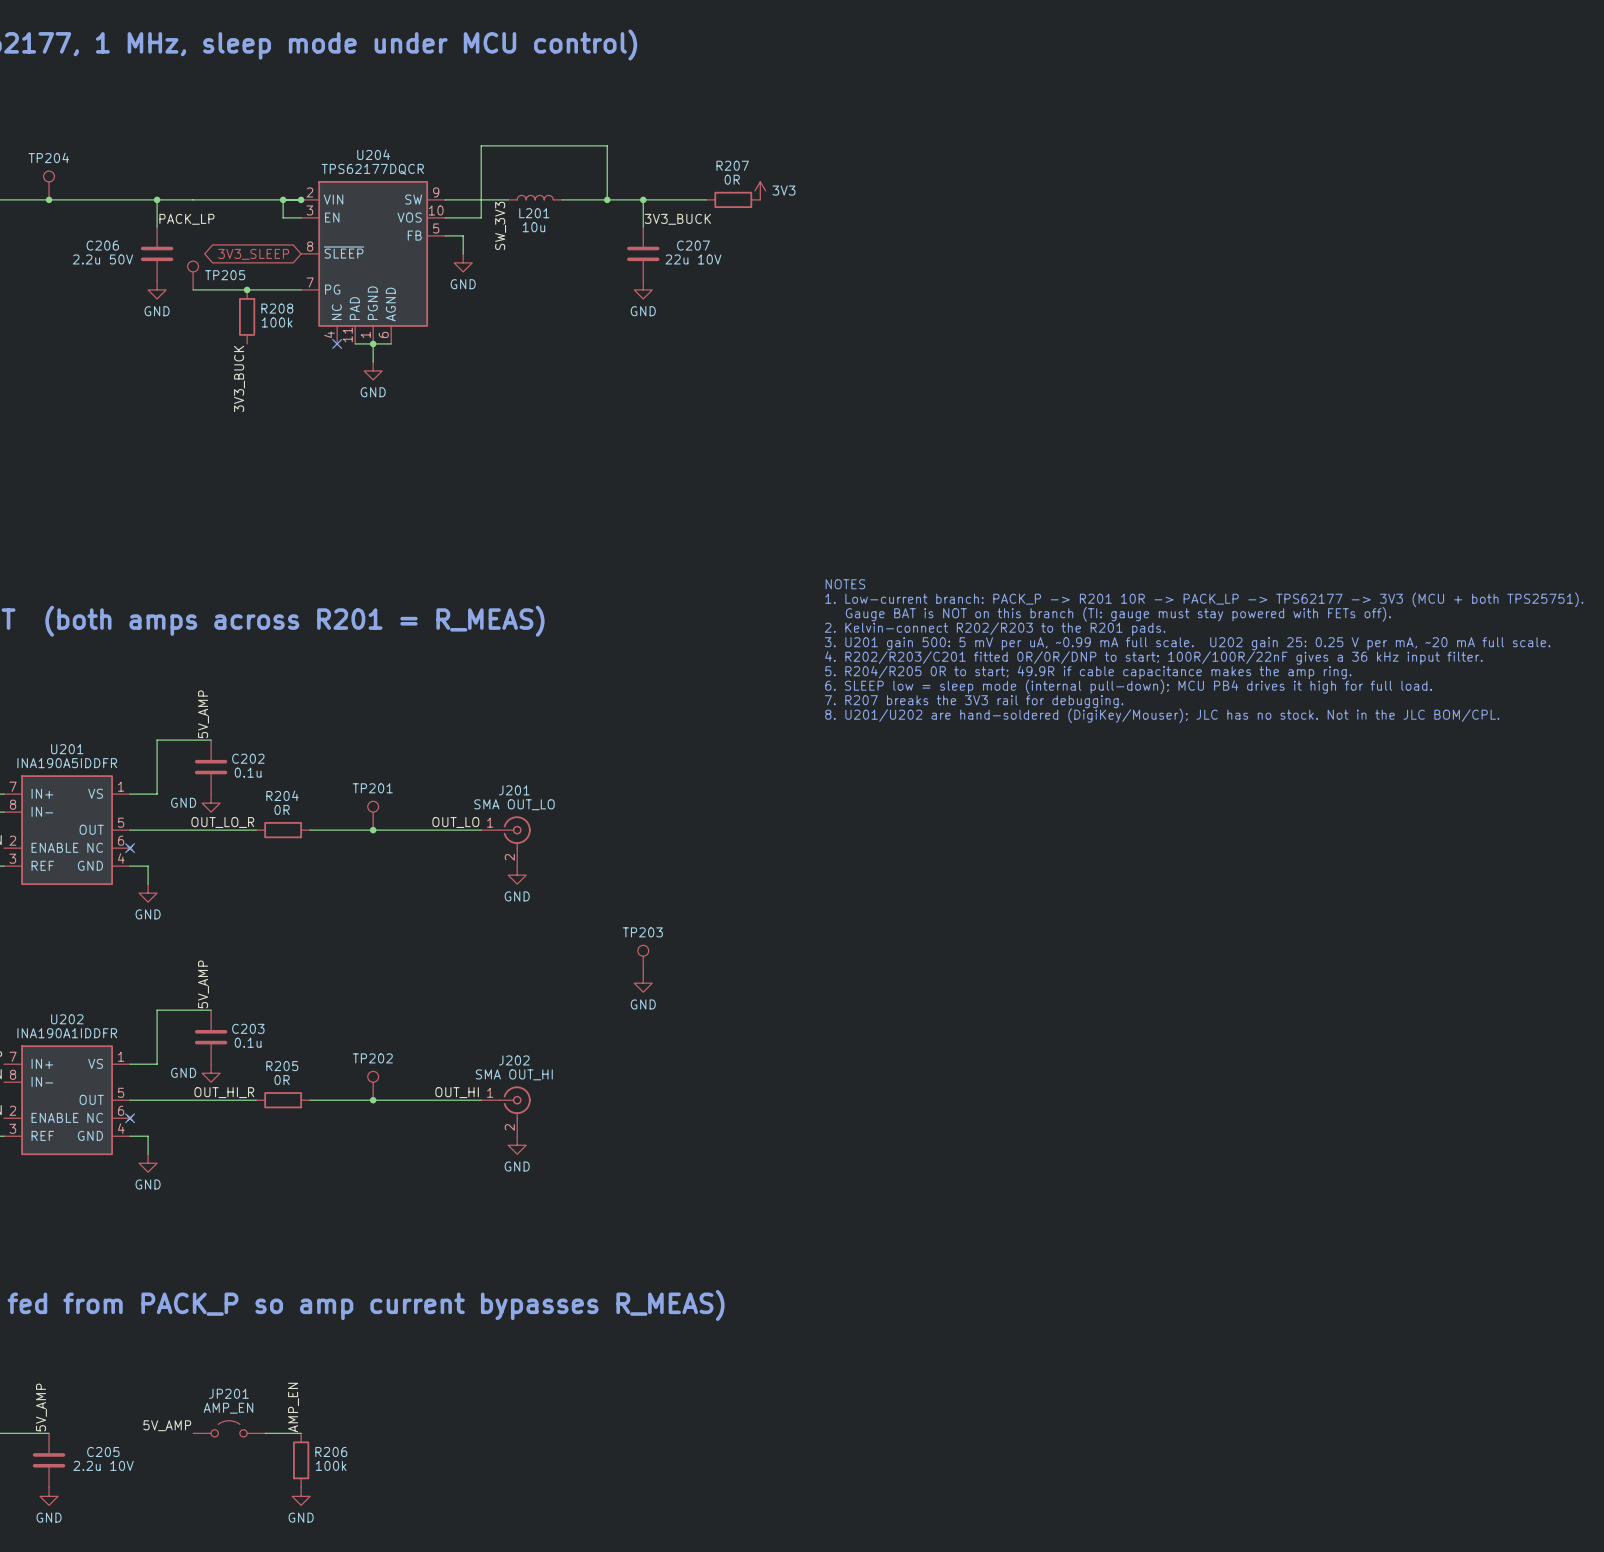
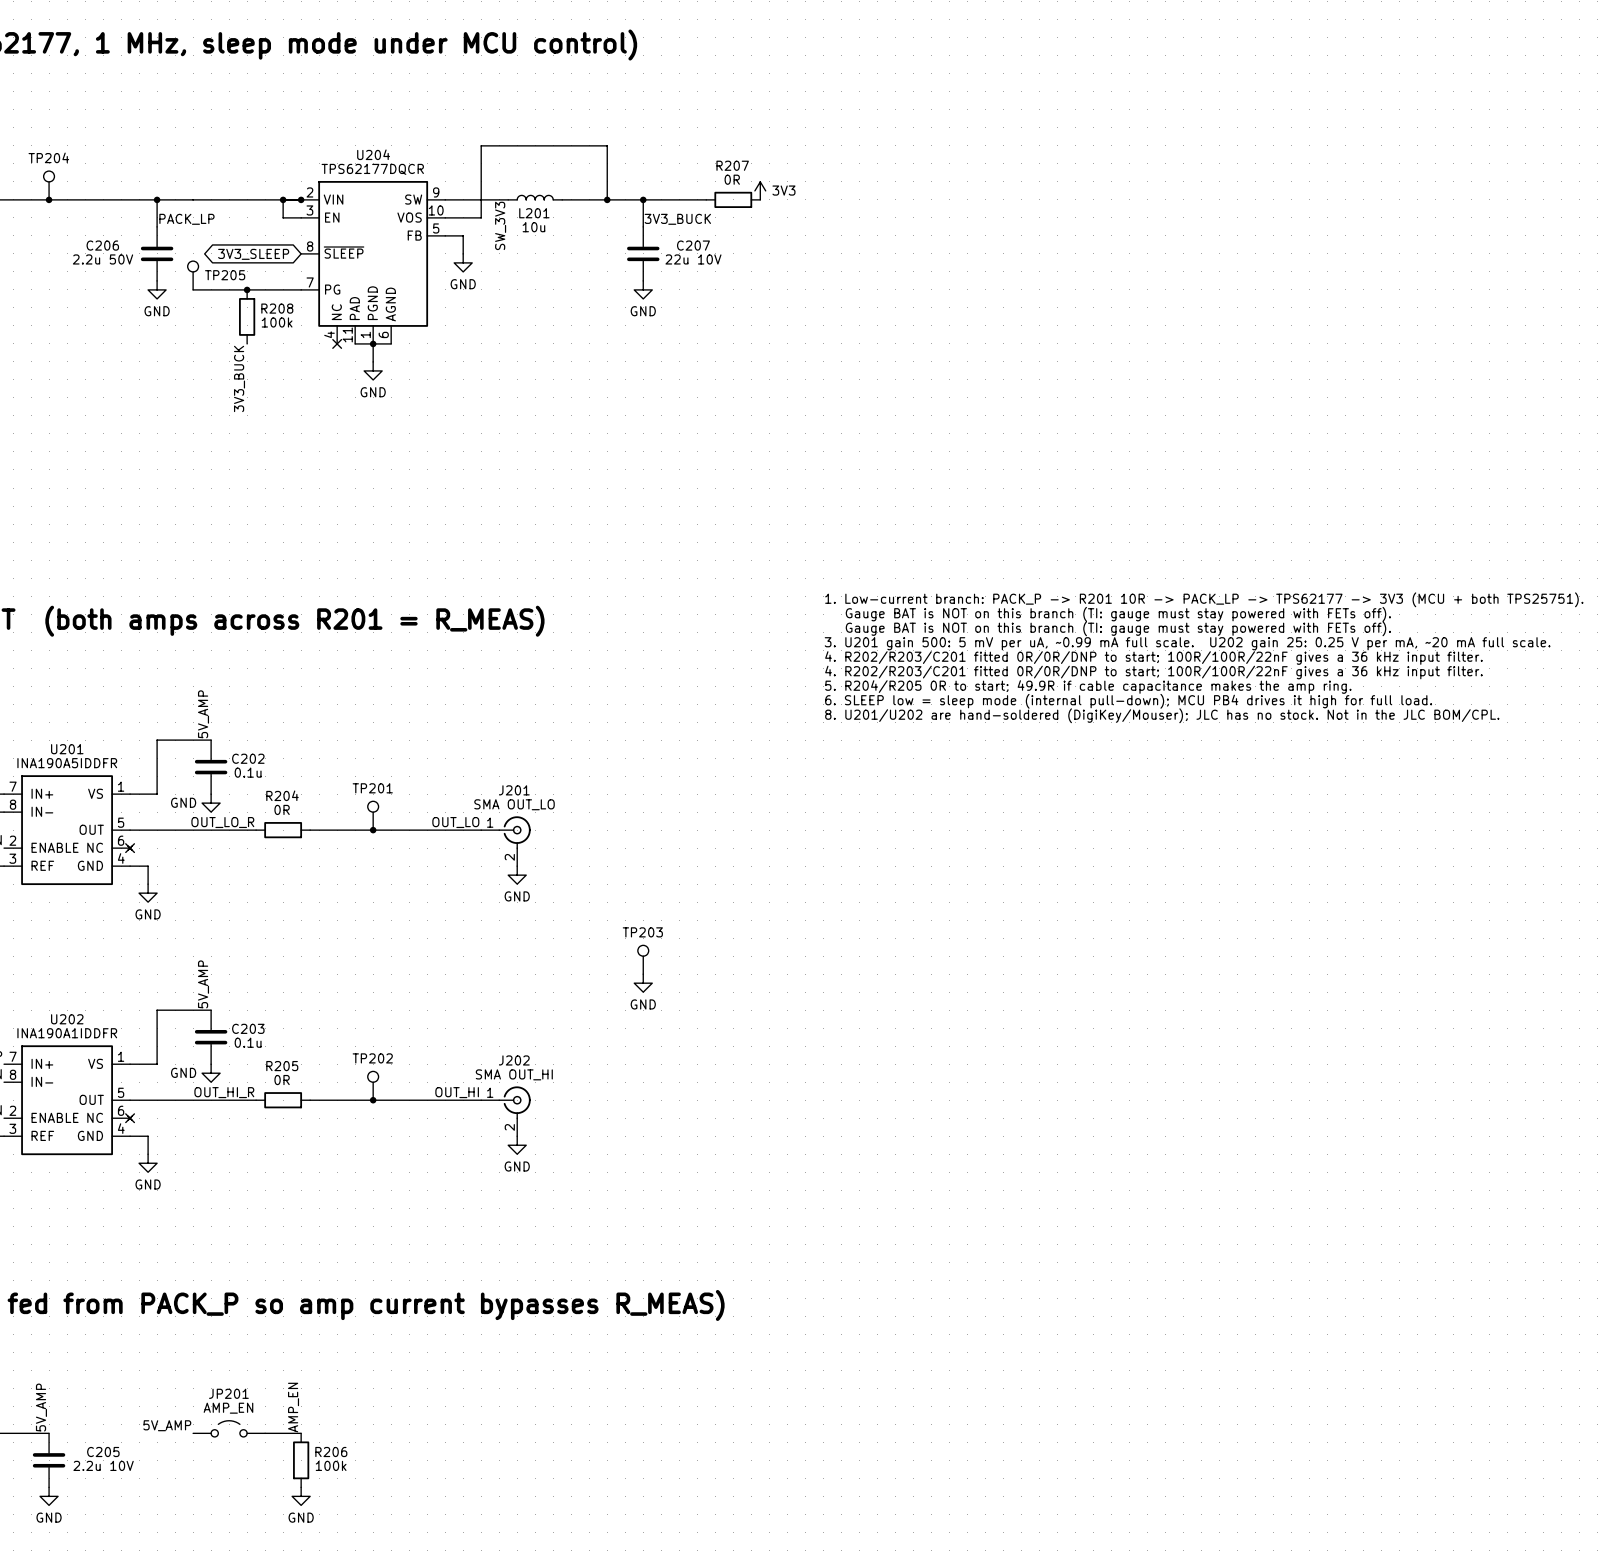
text: NOTES (845, 584) -> none
text: 2. Kelvin-connect R202/R203 to the R201 pads. (995, 629) -> Gauge BAT is NOT on this branch (TI: gauge must stay powered with FETs off). (1118, 628)
text: 5. R204/R205 0R to start; 49.9R if cable capacitance makes the amp ring. (1088, 672) -> 4. R202/R203/C201 fitted 0R/0R/DNP to start; 100R/100R/22nF gives a 36 kHz input filter. (1153, 672)
text: 6. SLEEP low = sleep mode (internal pull-down); MCU PB4 drives it high for full load. (1128, 686) -> 5. R204/R205 0R to start; 49.9R if cable capacitance makes the amp ring. (1088, 687)
text: 7. R207 breaks the 3V3 rail for debugging. (974, 701) -> 6. SLEEP low = sleep mode (internal pull-down); MCU PB4 drives it high for full load. (1128, 701)

